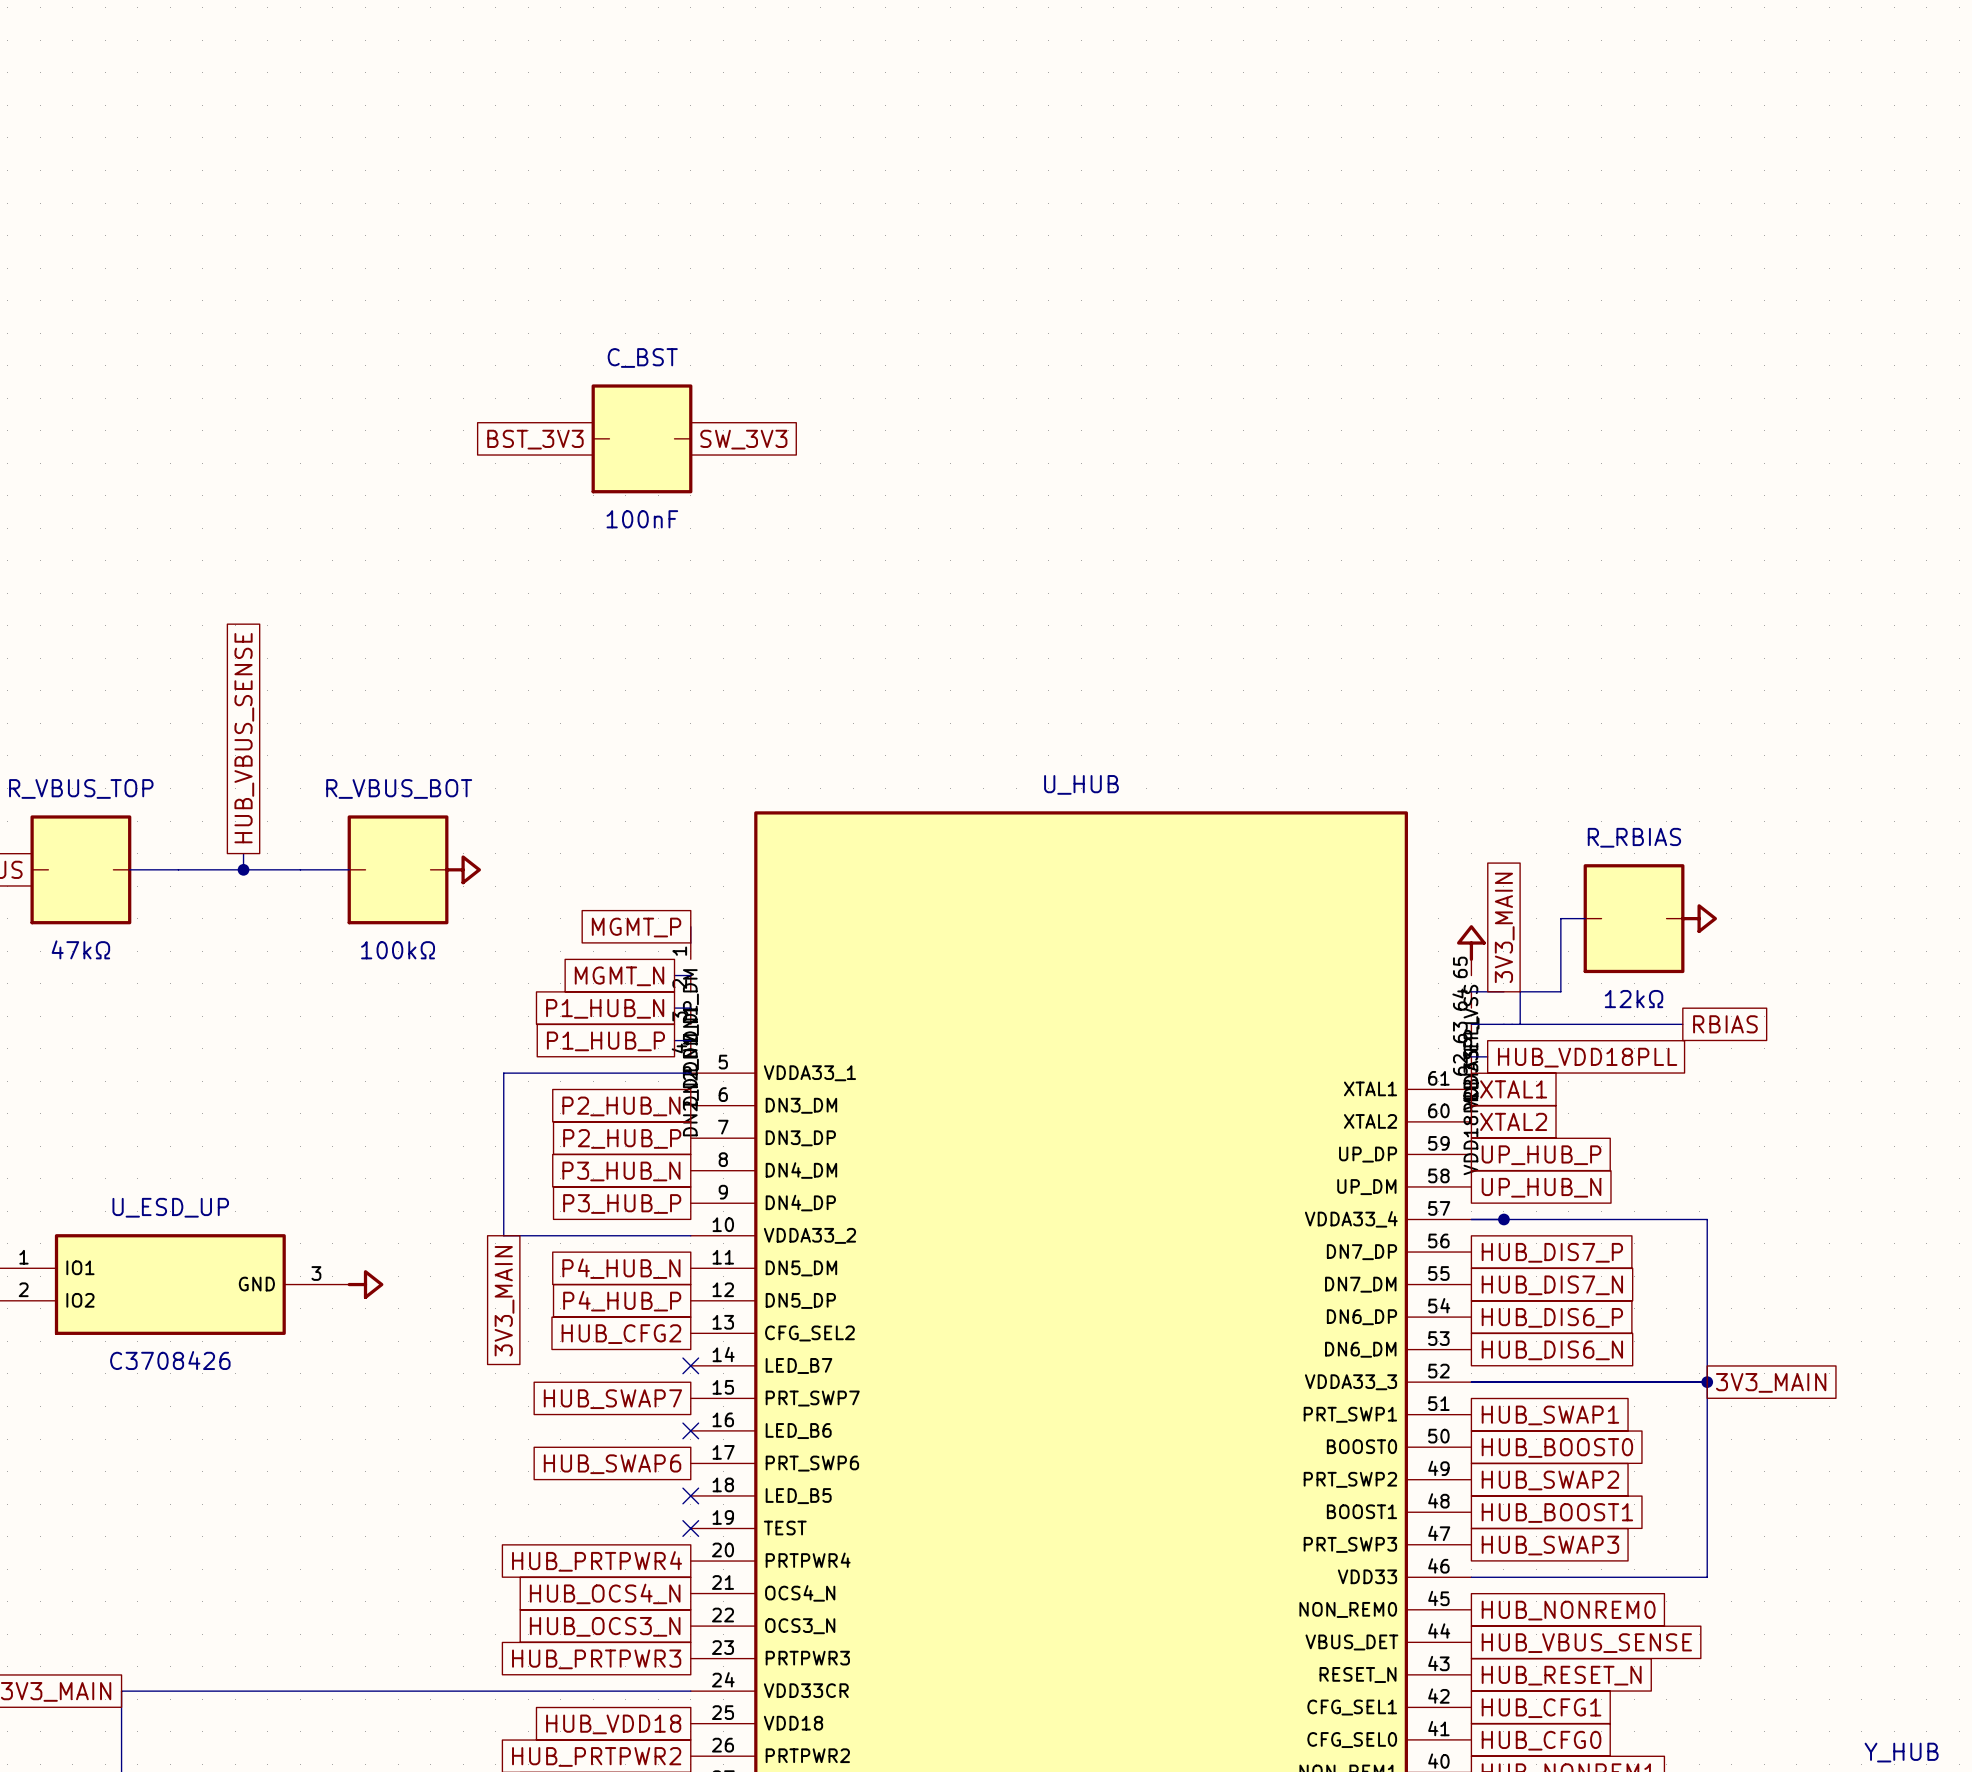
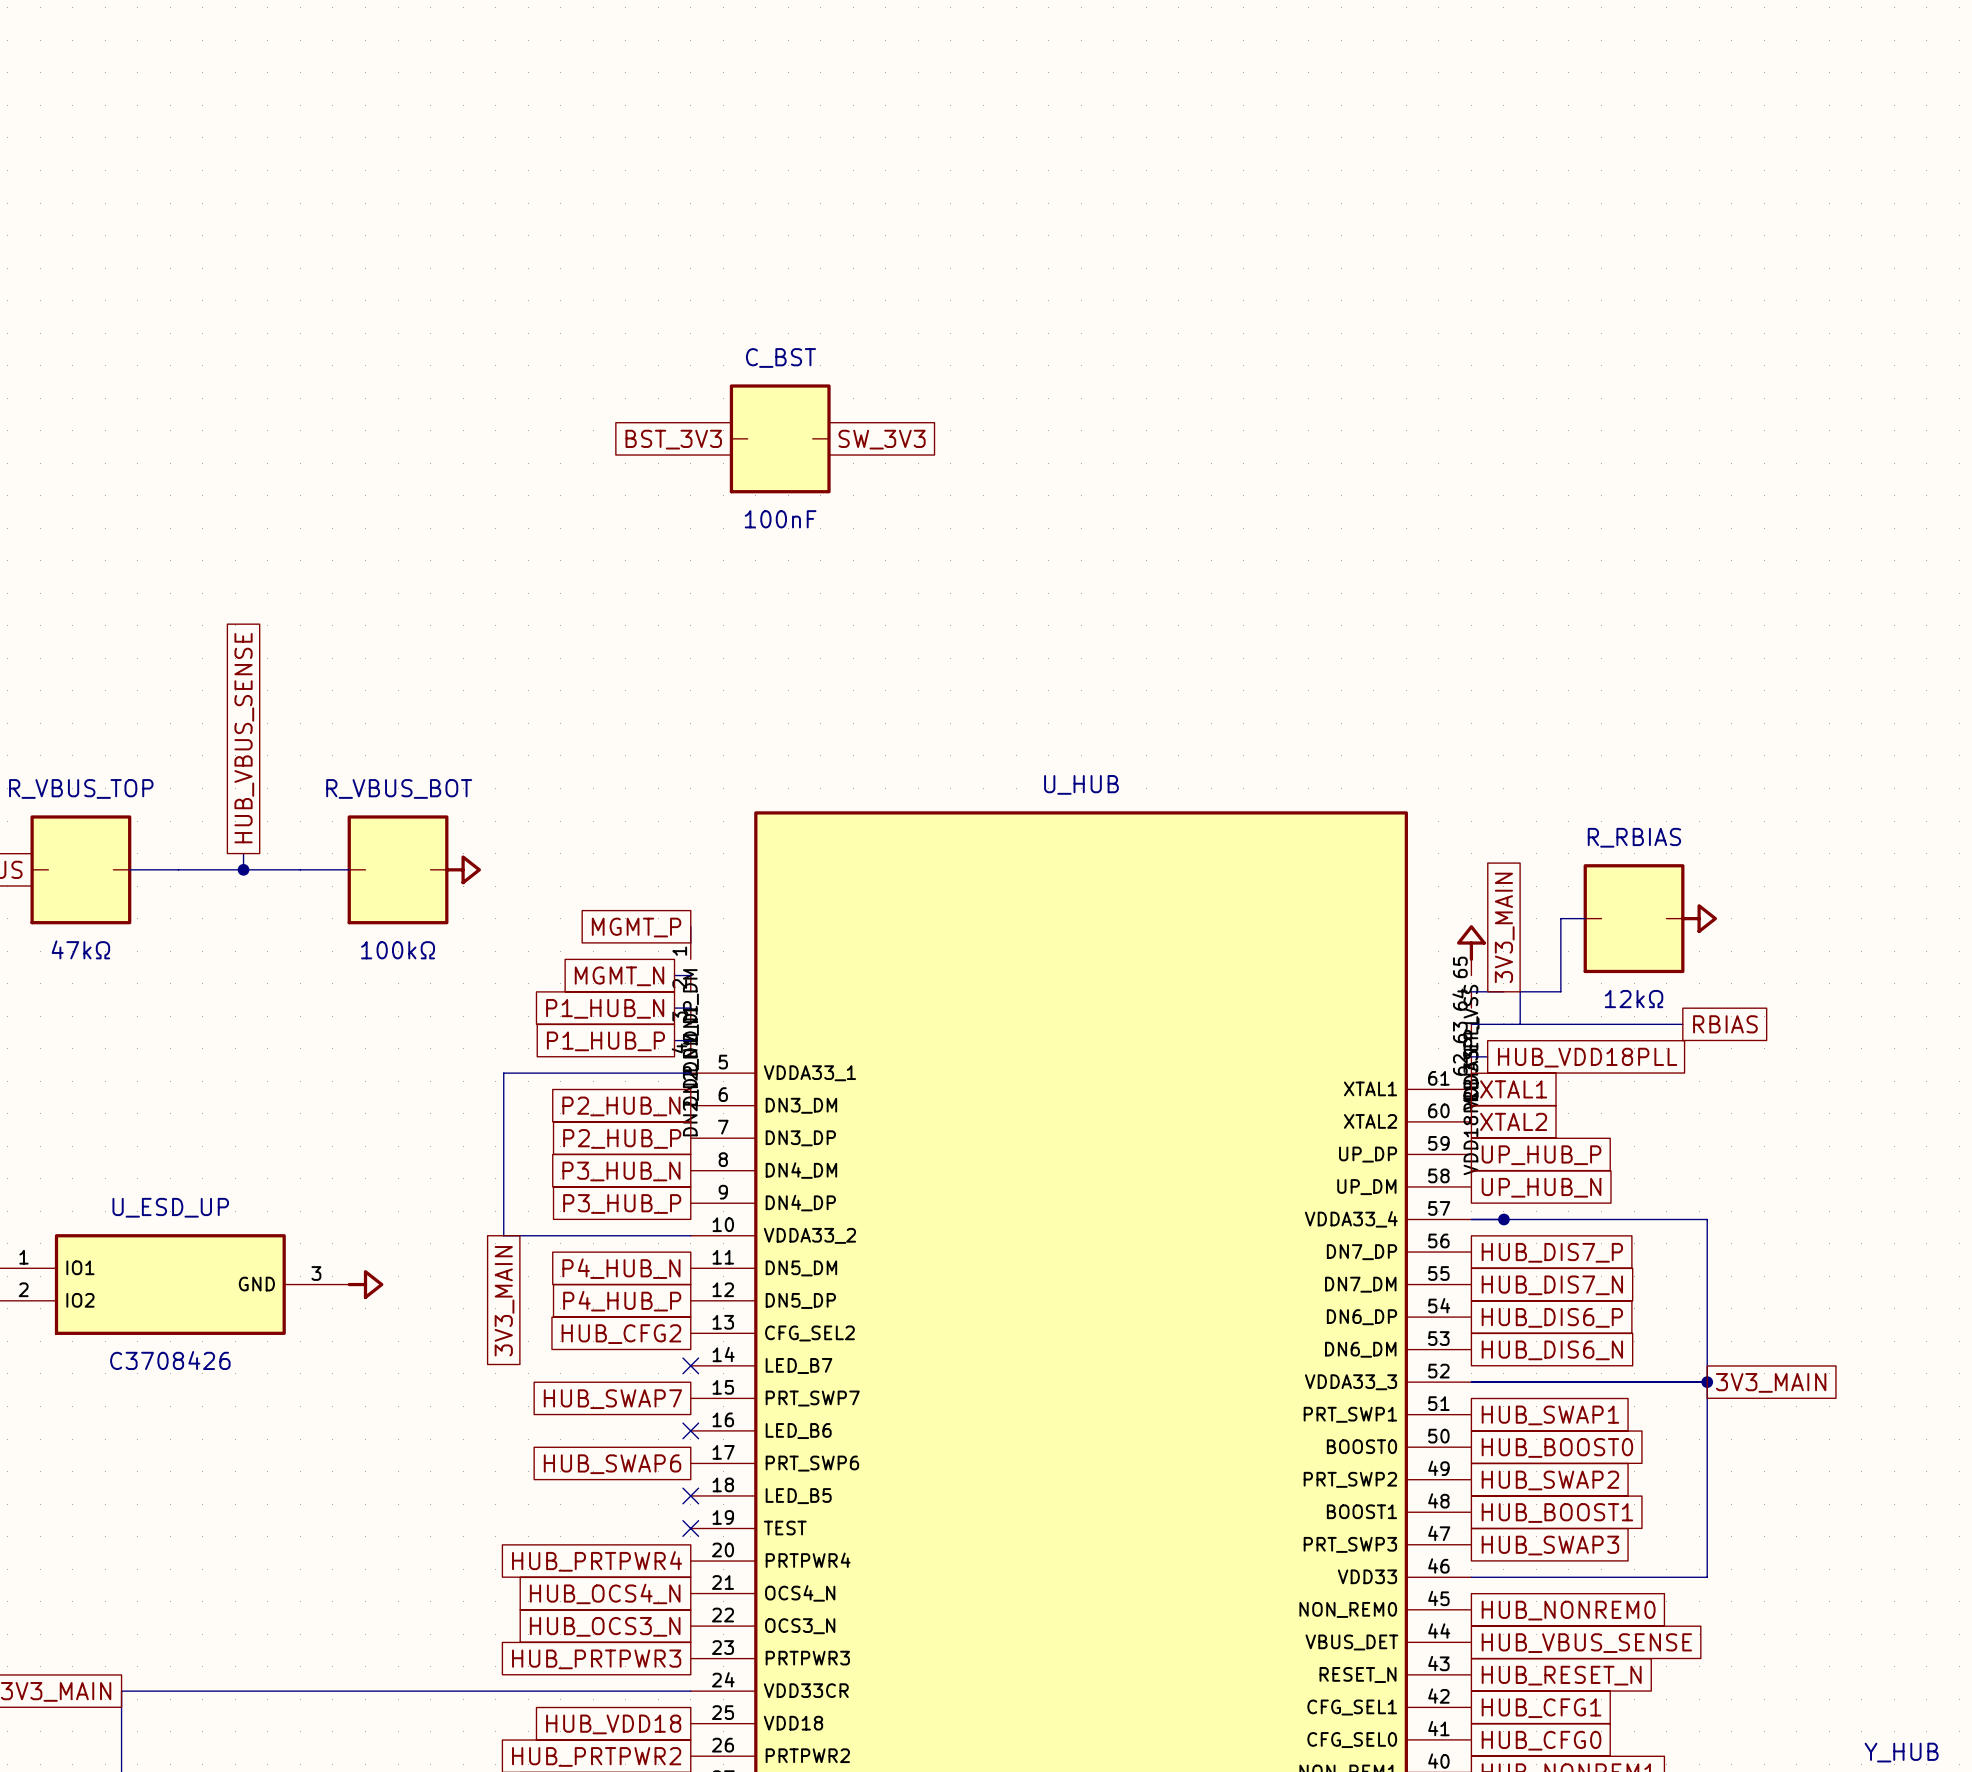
C_BST position: (641, 438) -> (780, 438)
global label position: BST_3V3 (535, 439) -> BST_3V3 (673, 439)
global label position: SW_3V3 (743, 439) -> SW_3V3 (882, 439)

